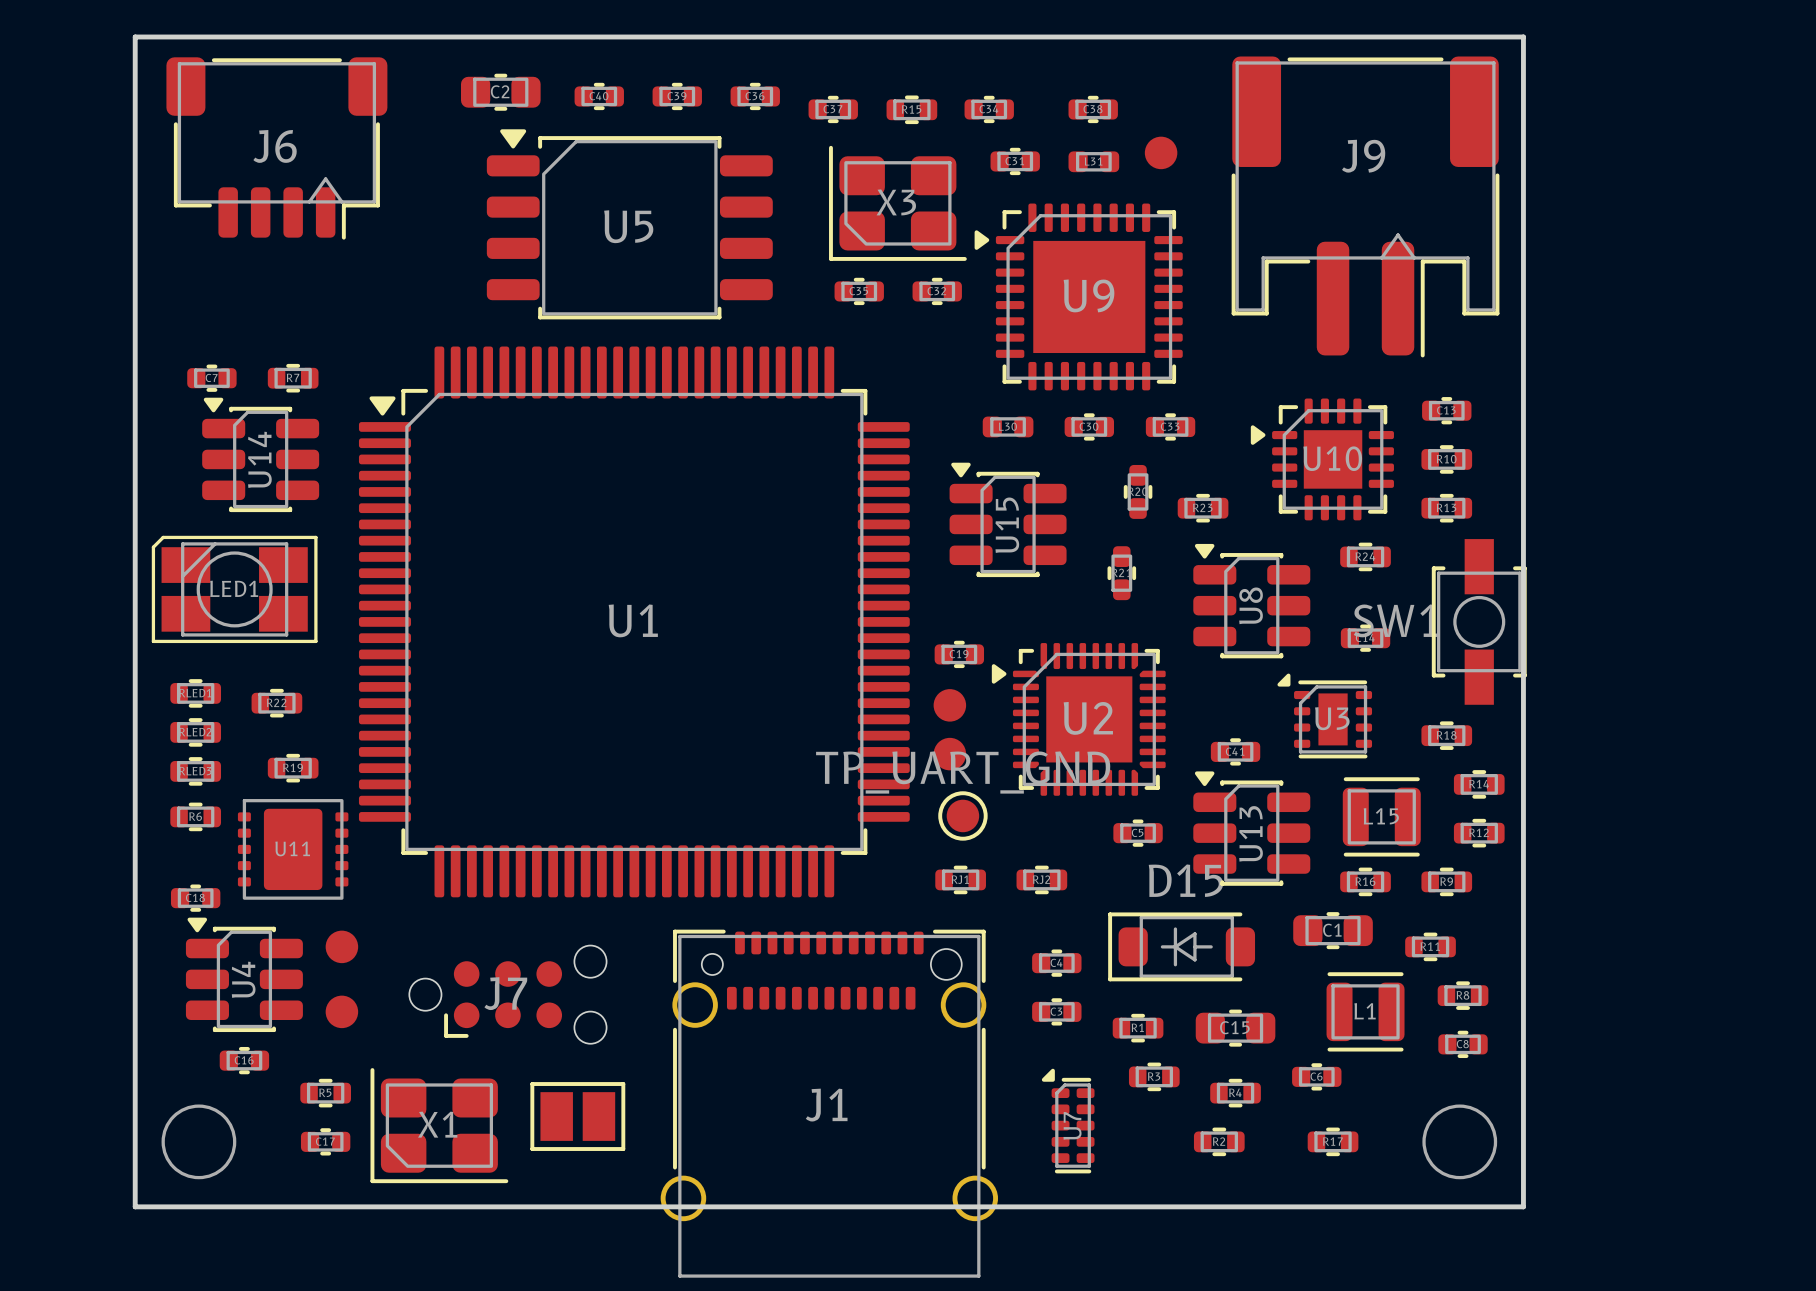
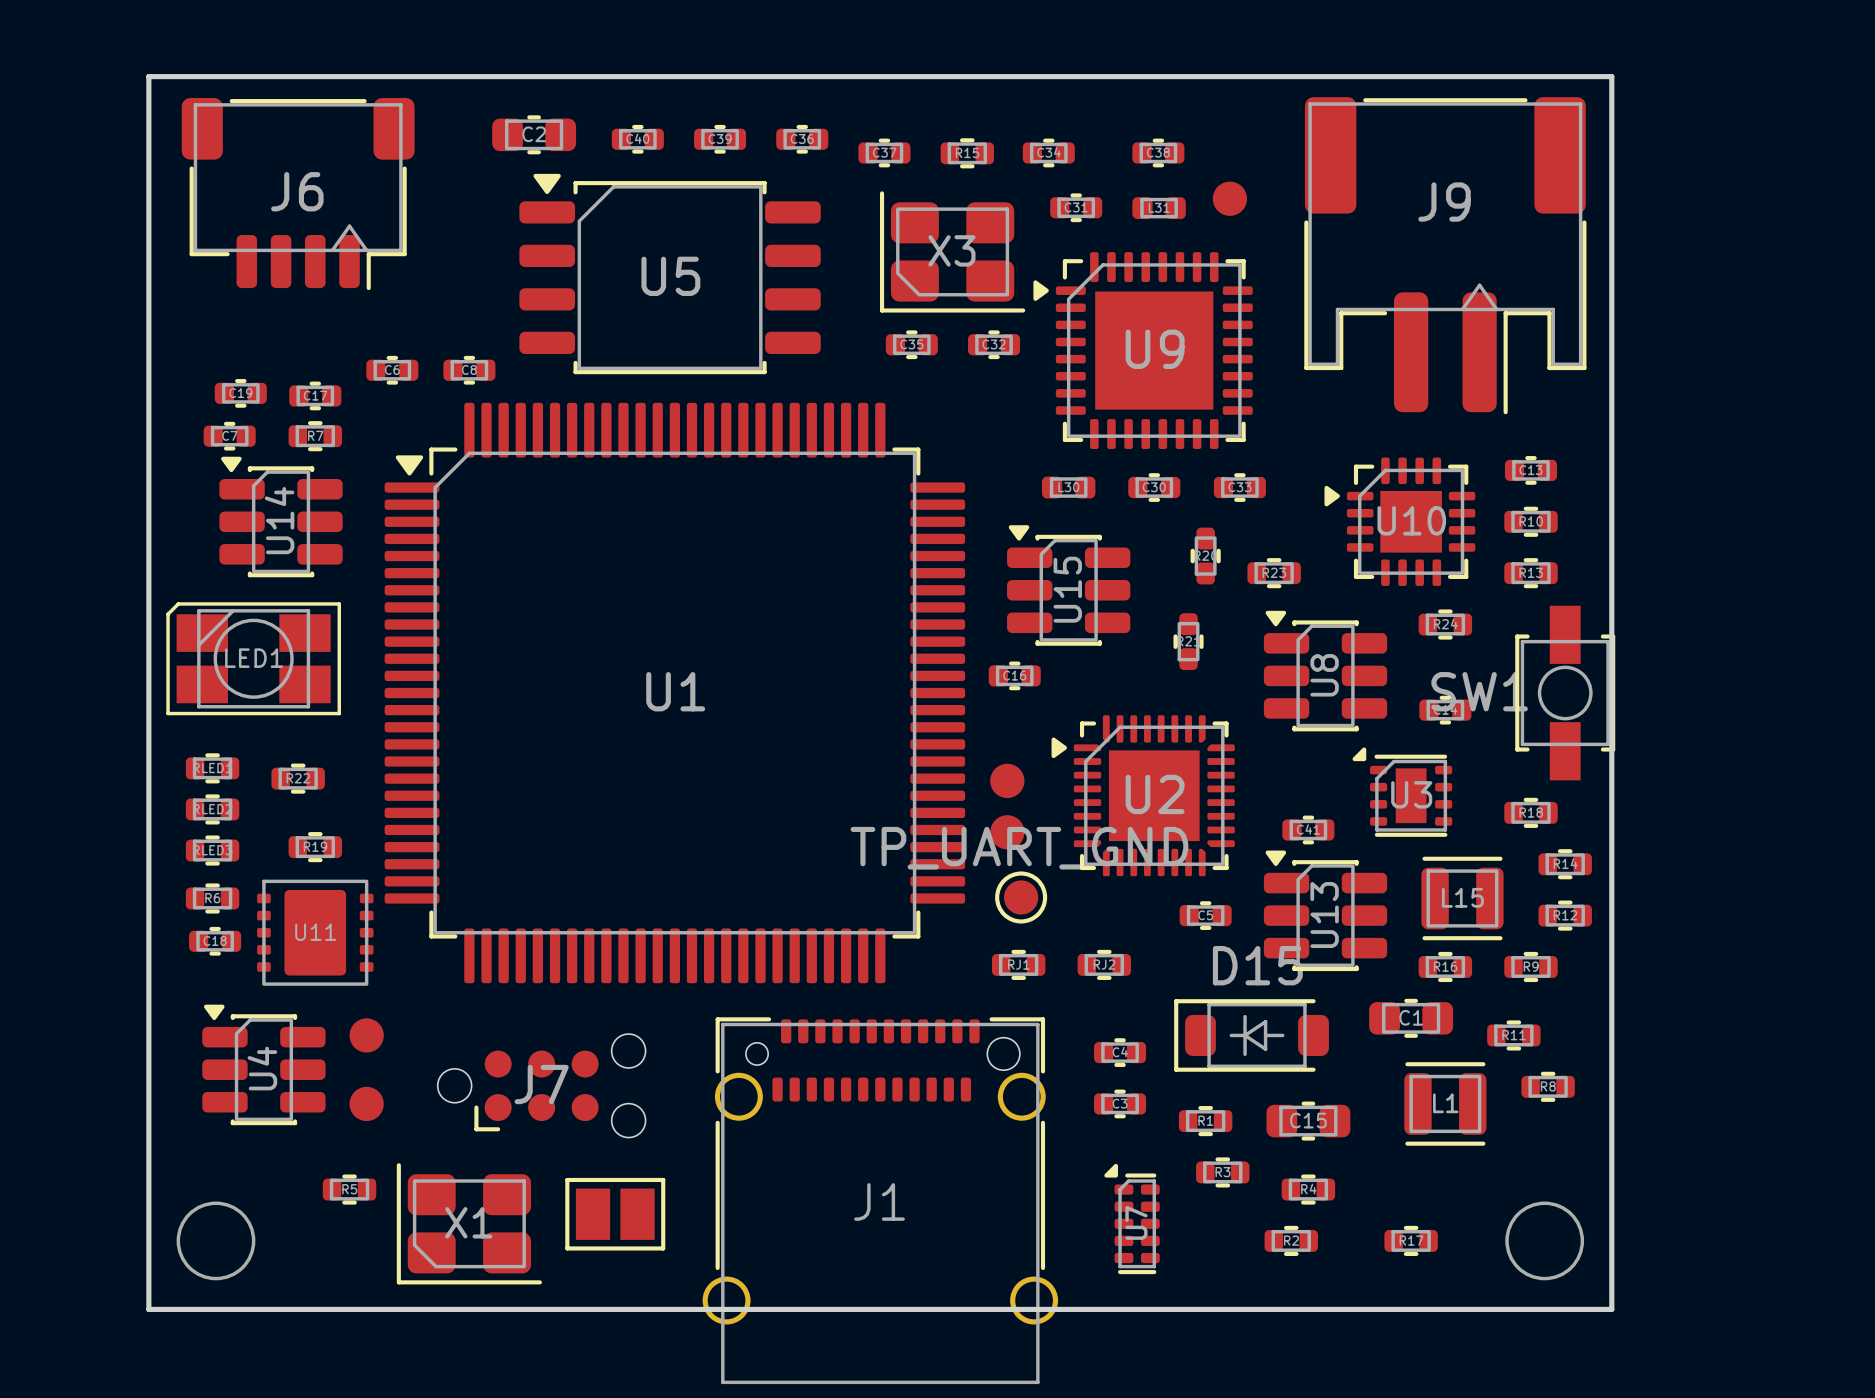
C19 position: (959, 654) -> (240, 393)
C18 position: (195, 898) -> (215, 941)
C8 position: (1463, 1044) -> (469, 370)
C16 position: (244, 1060) -> (1014, 675)
C6 position: (1316, 1076) -> (392, 370)
C17 position: (325, 1141) -> (315, 395)

